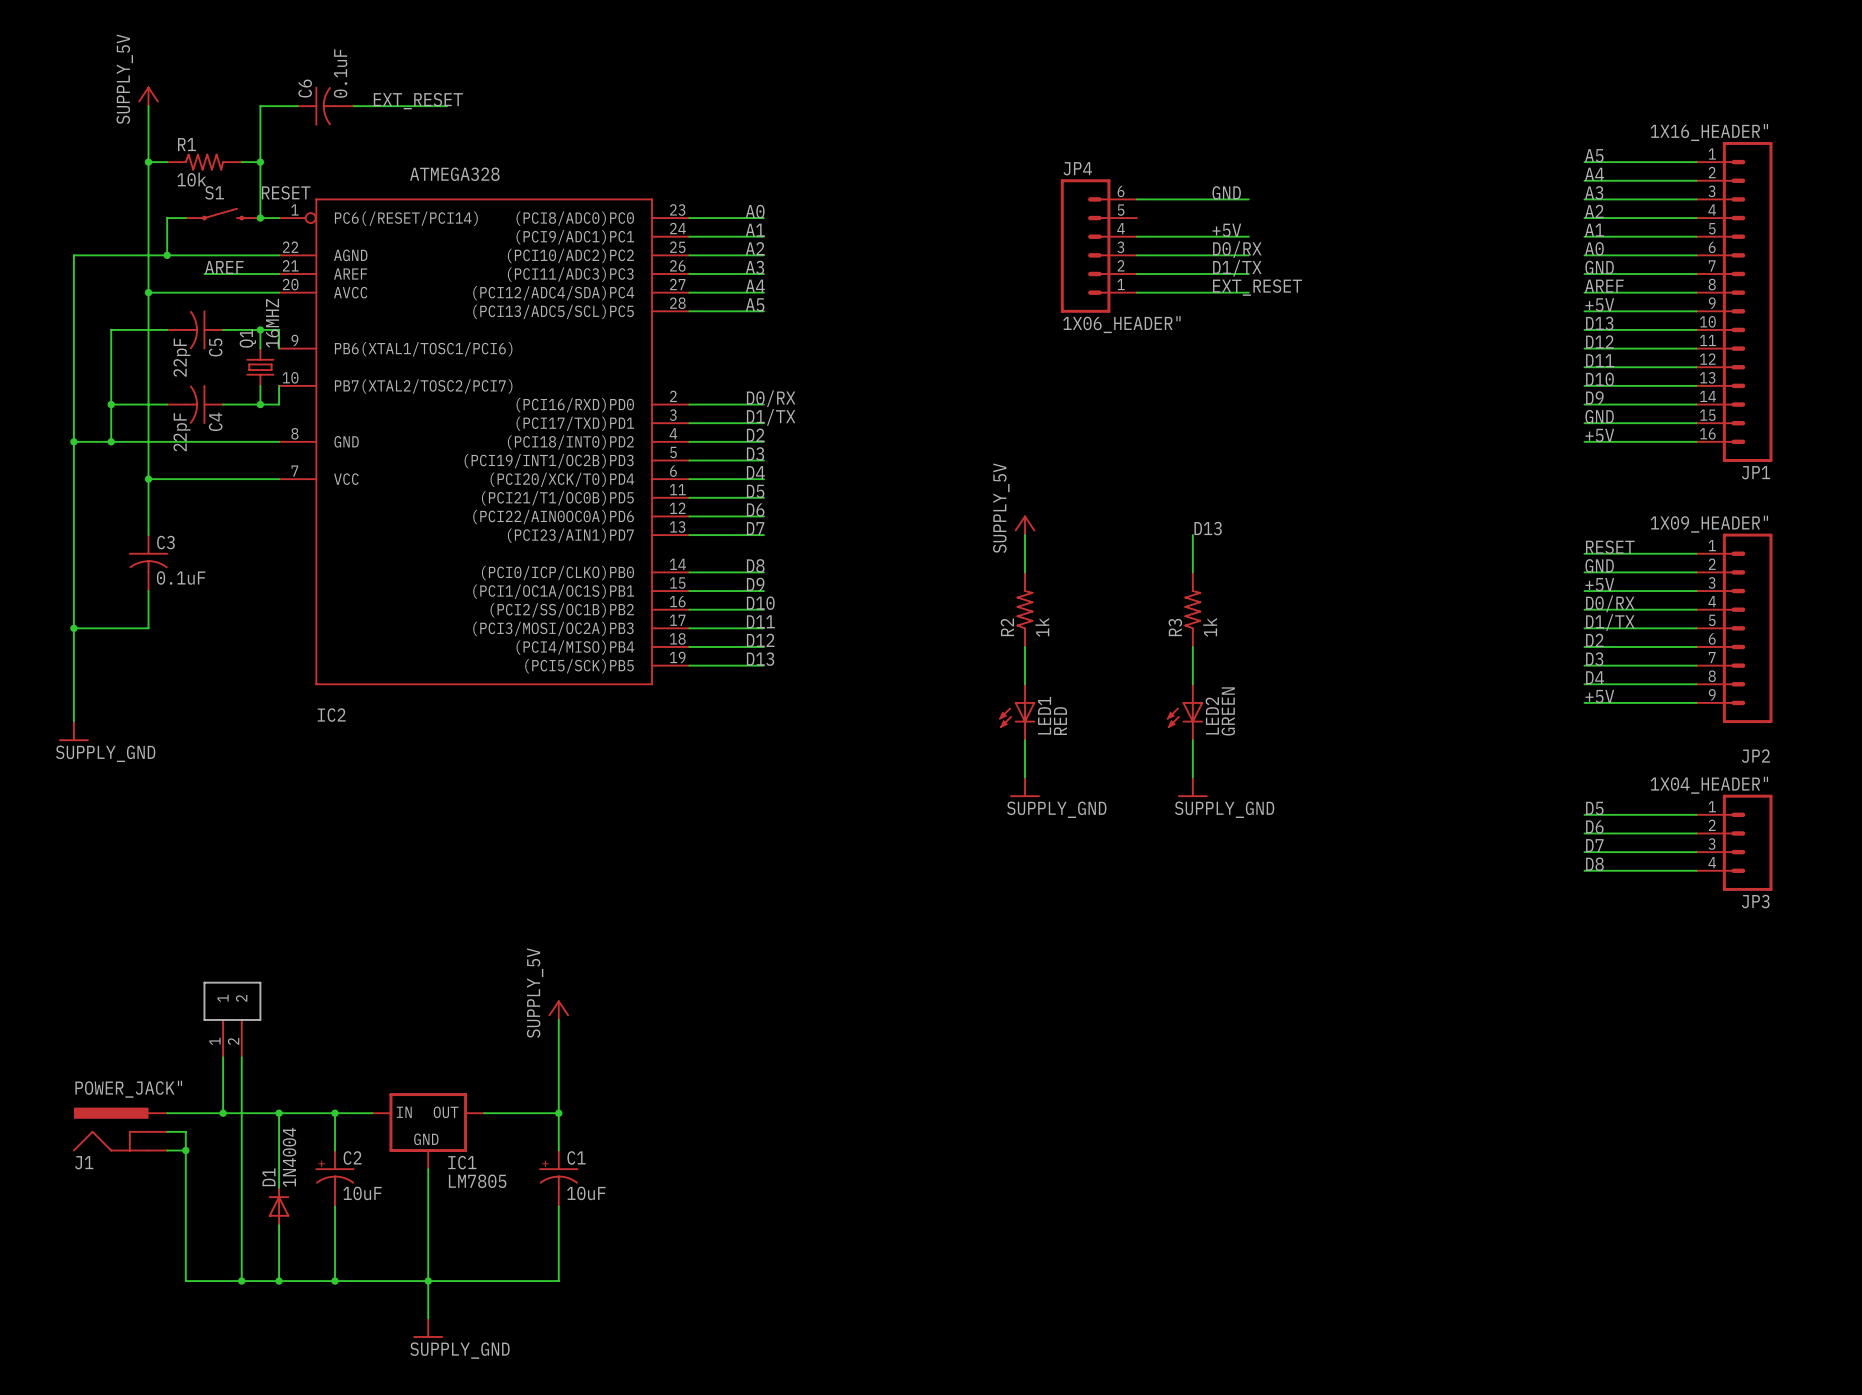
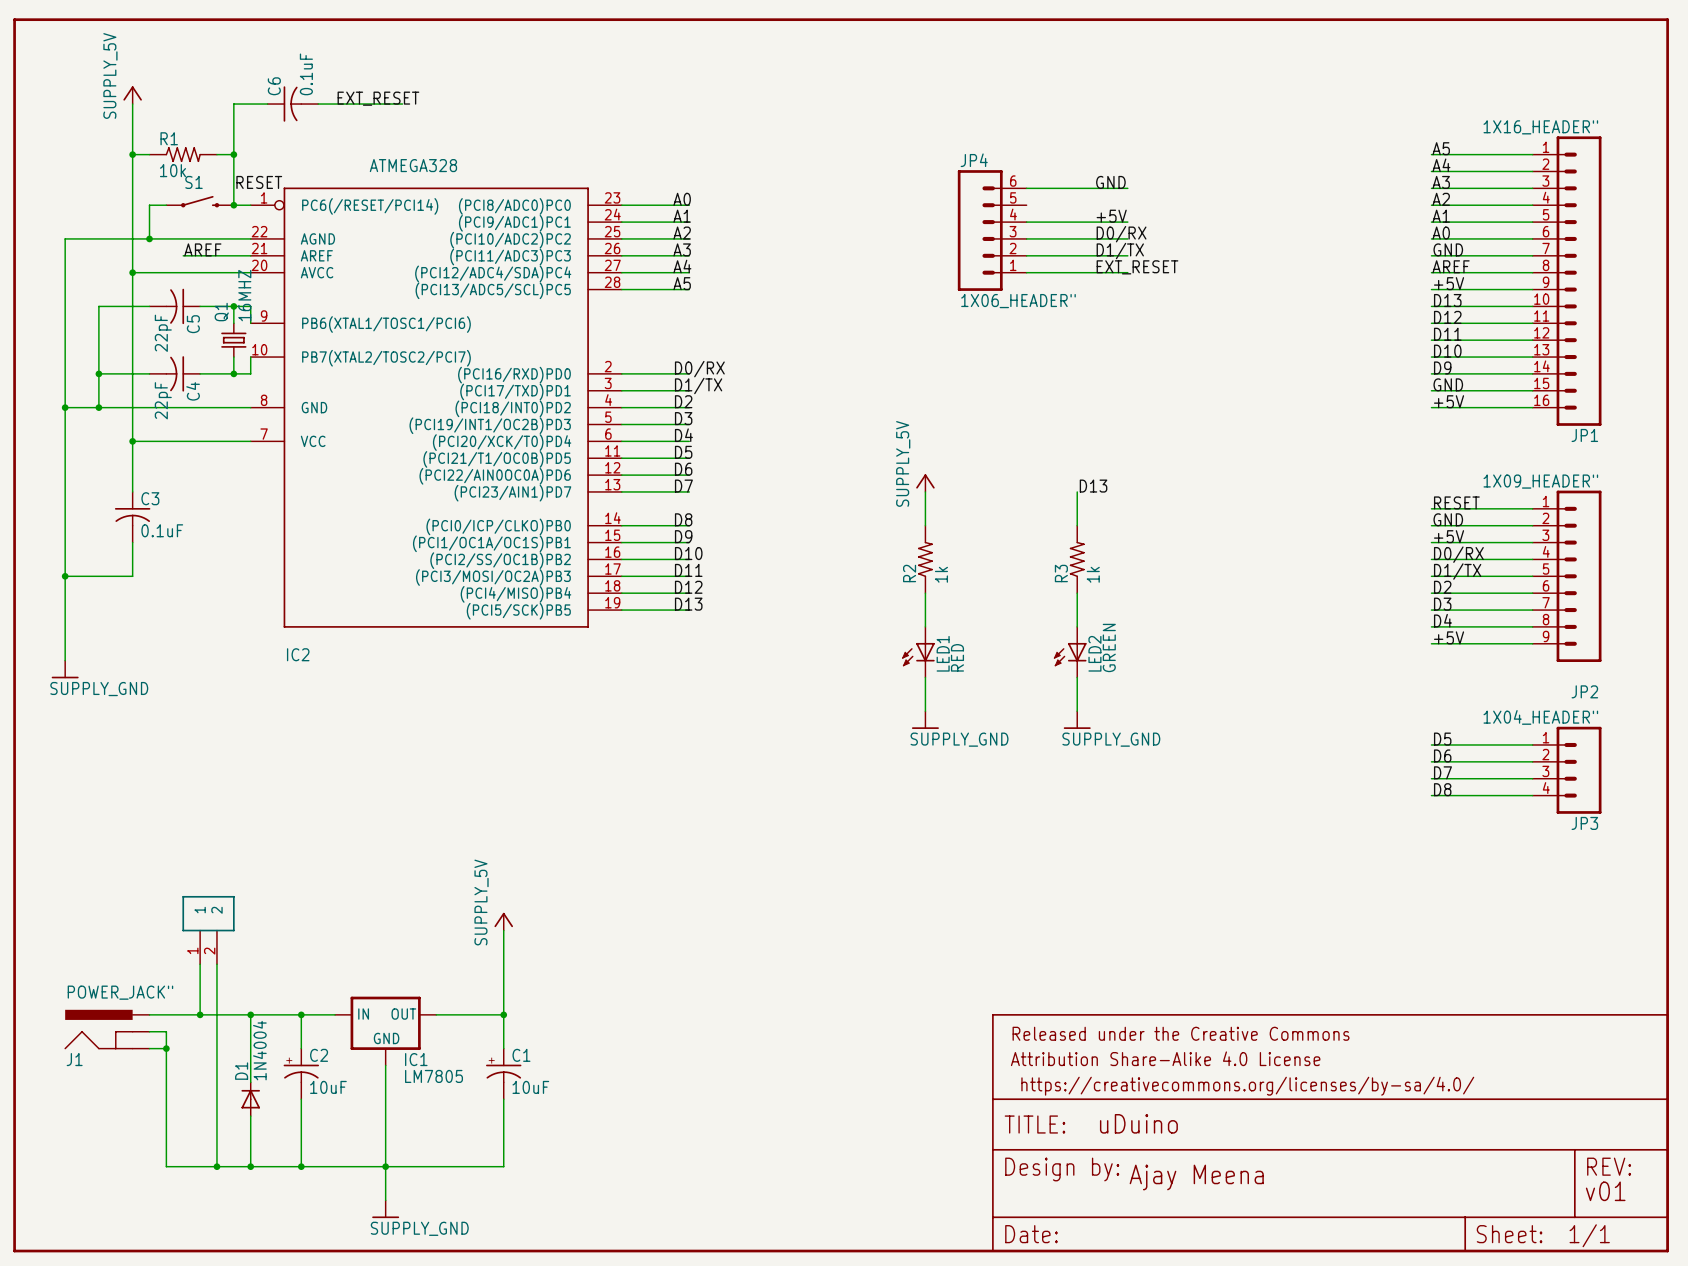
part: none -> (841, 635)
part: none -> (1330, 1132)

